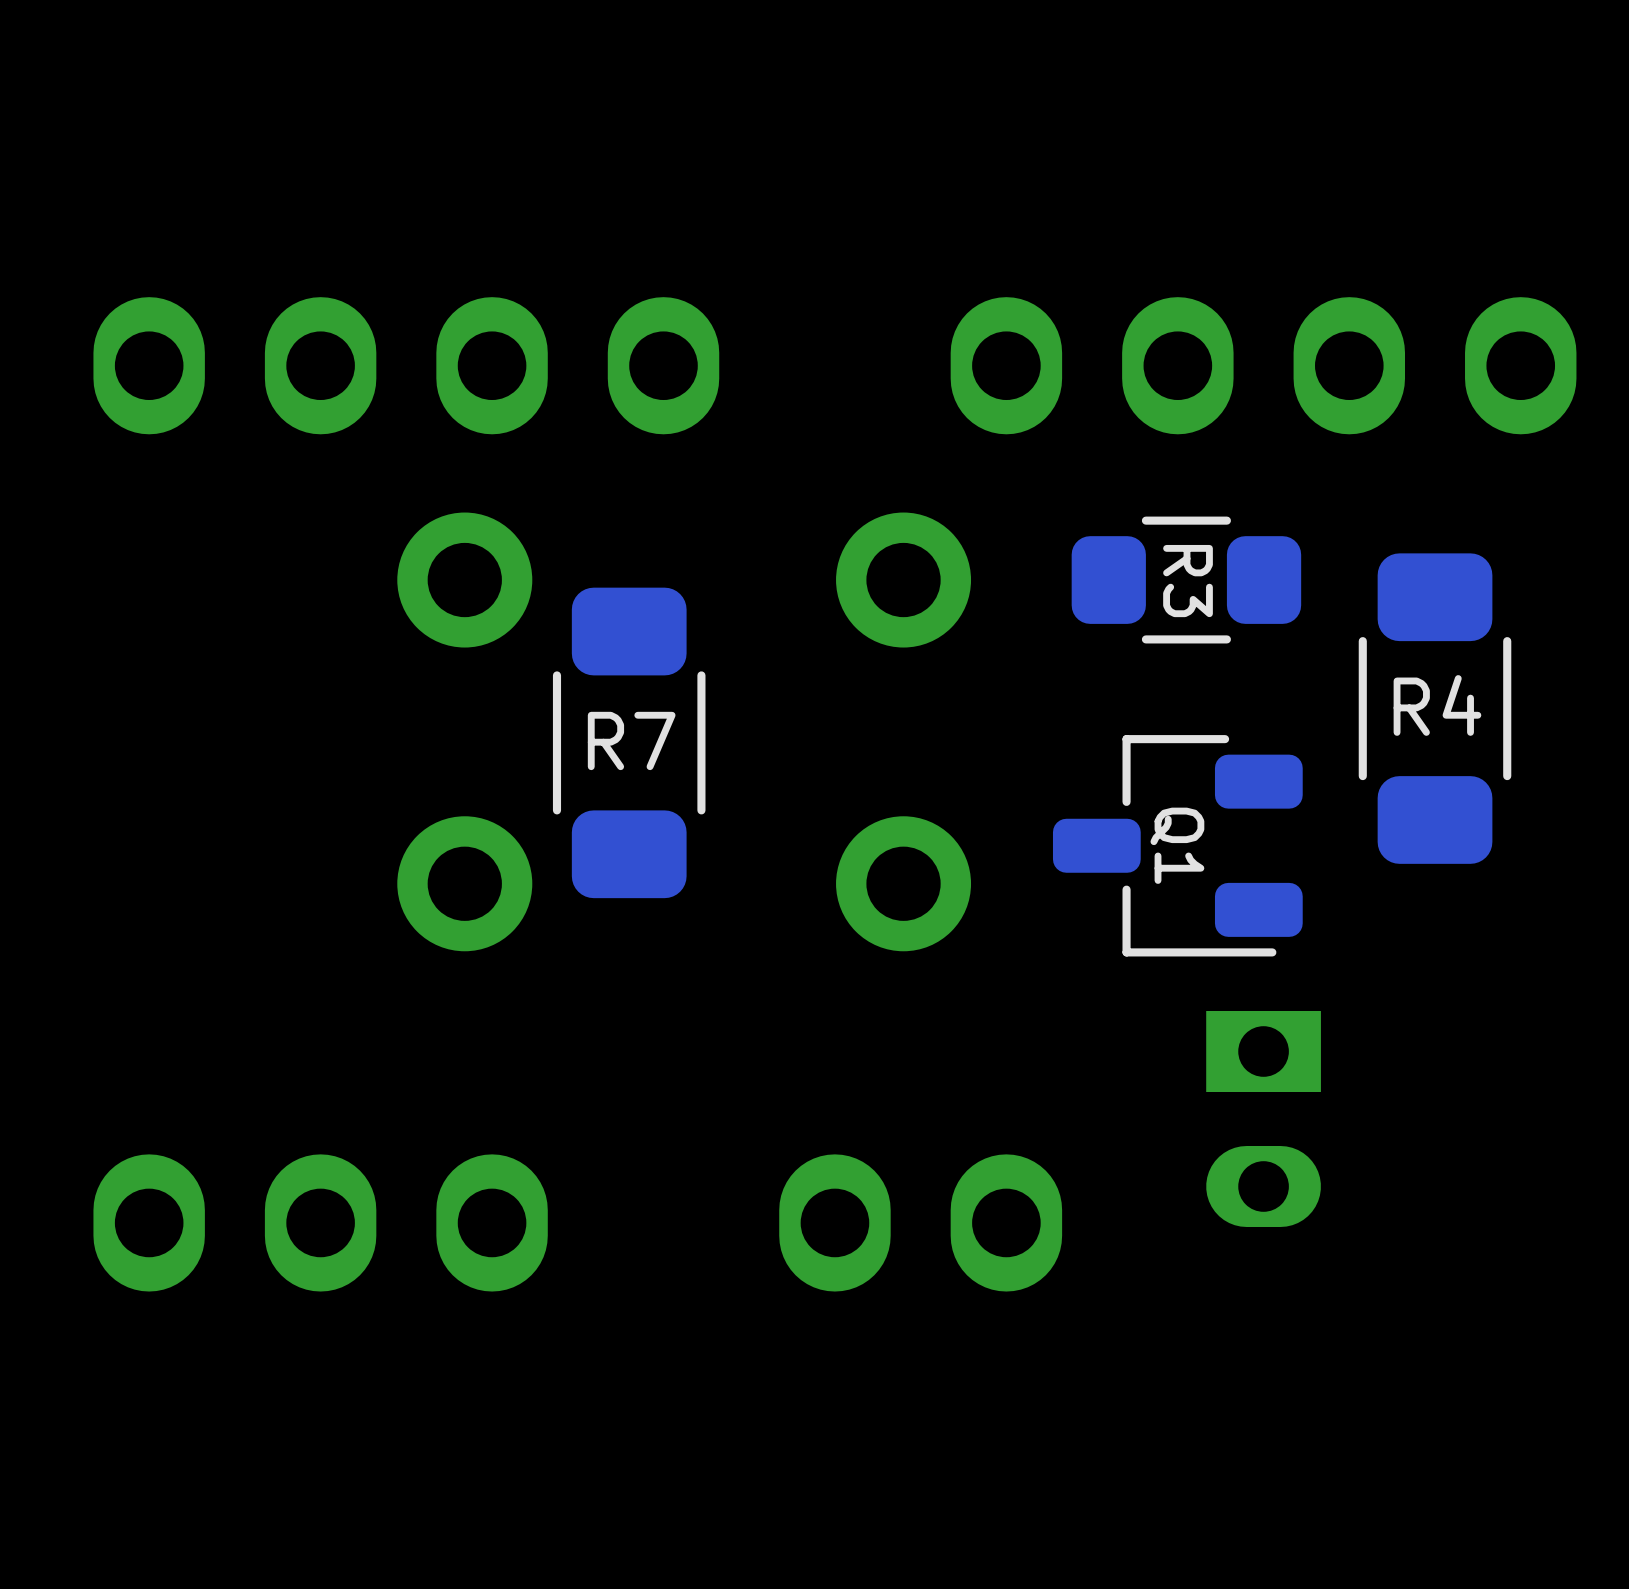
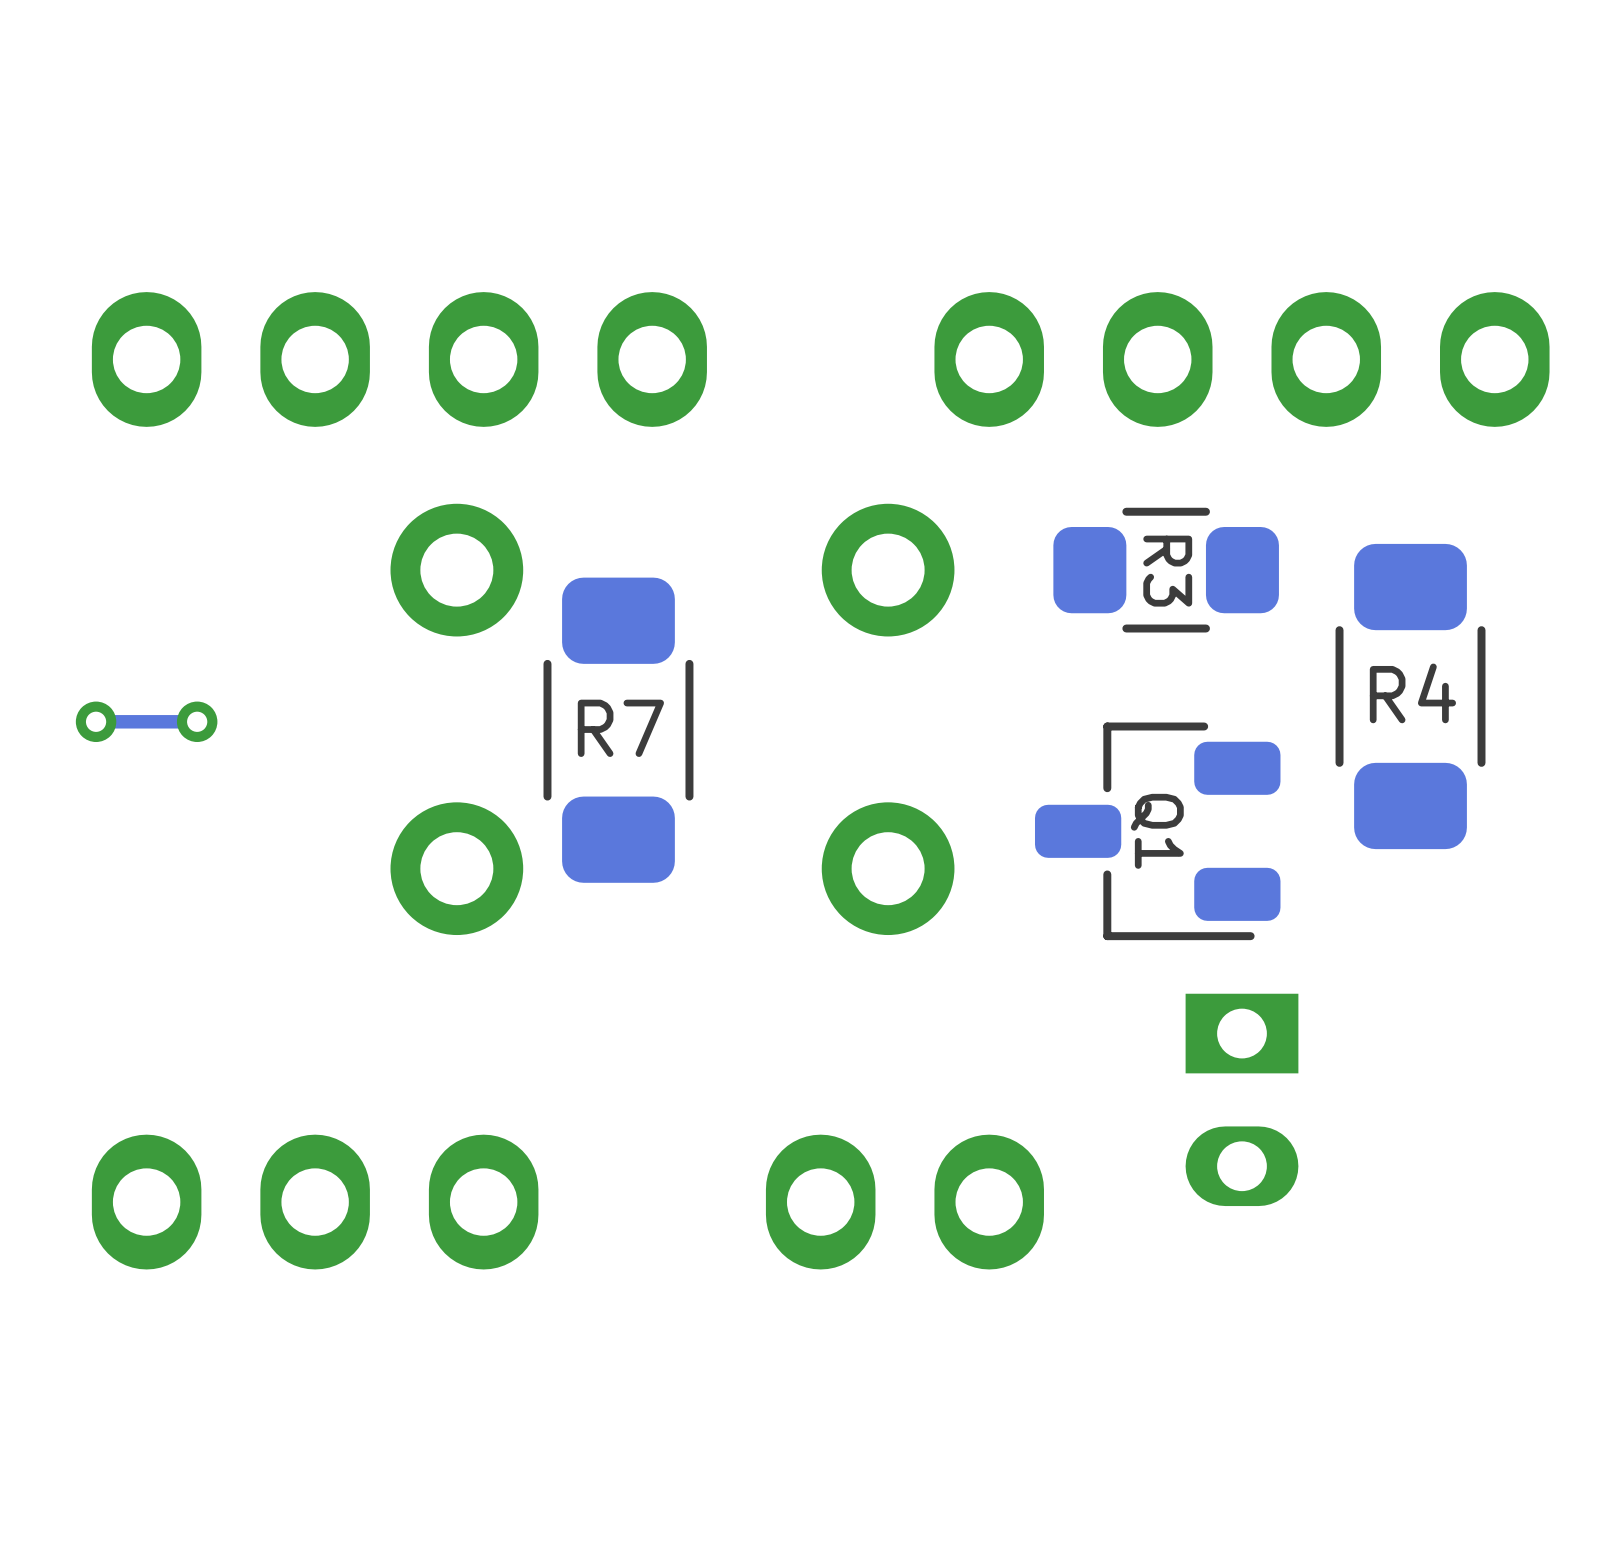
via: none -> (96, 721)
track: none -> (197, 721) (96, 721)
via: none -> (197, 721)

